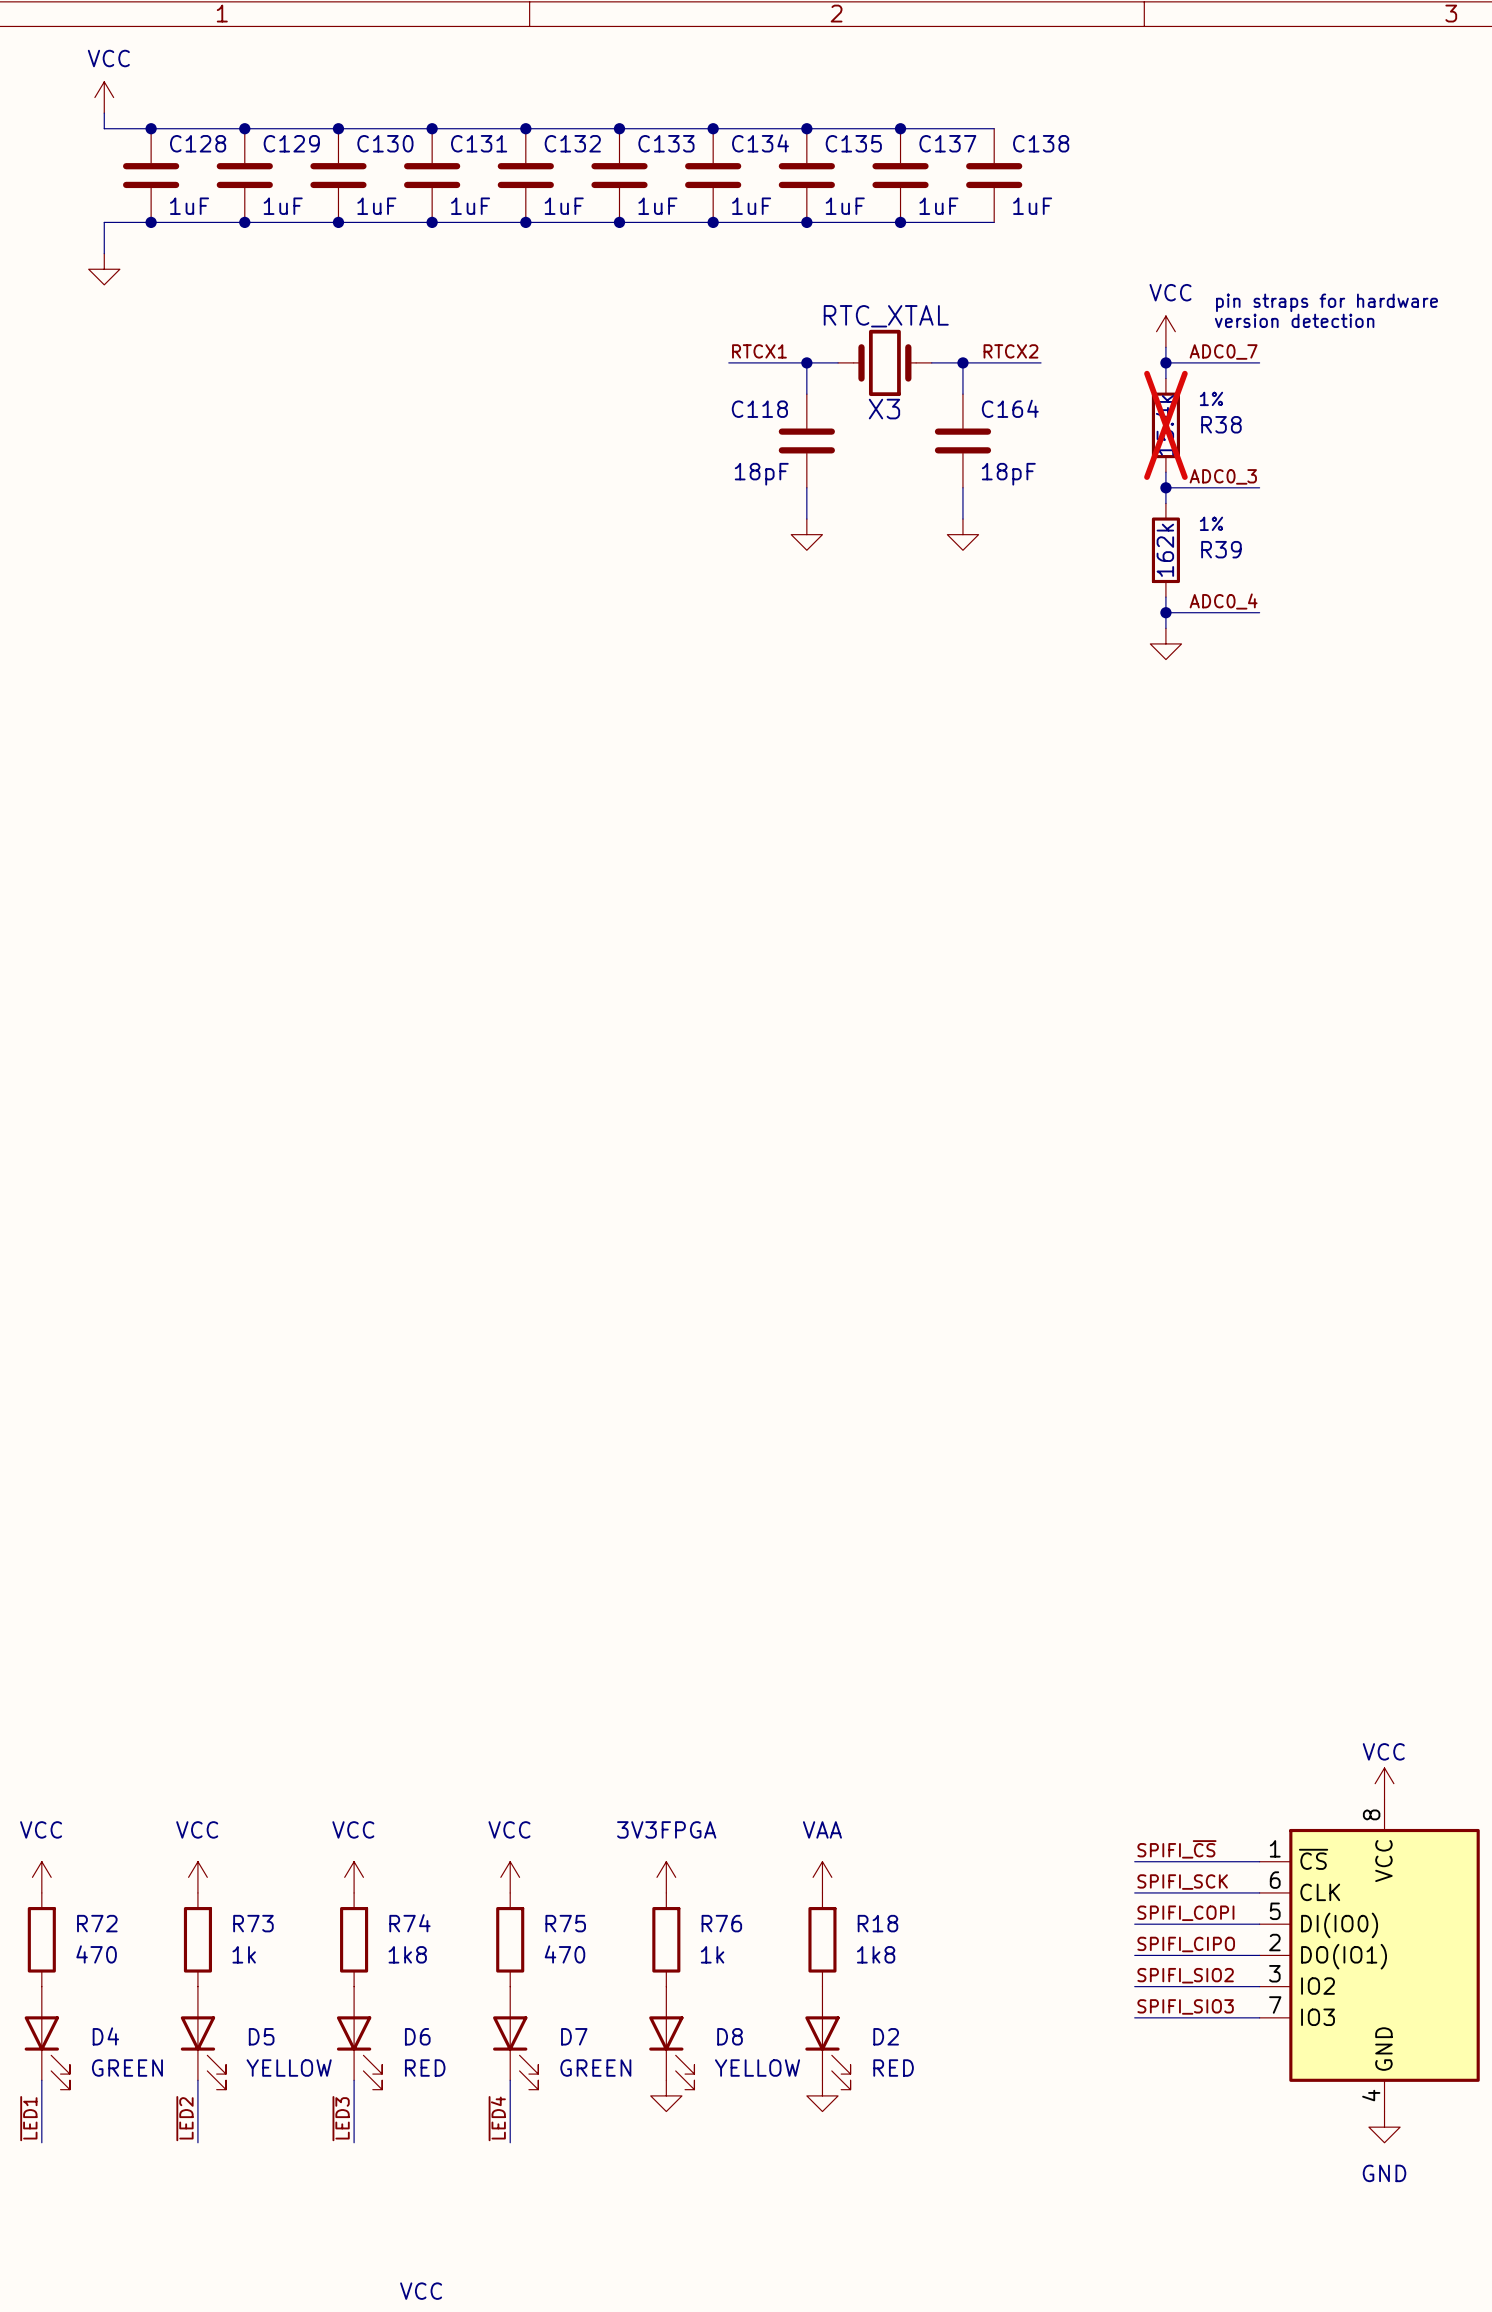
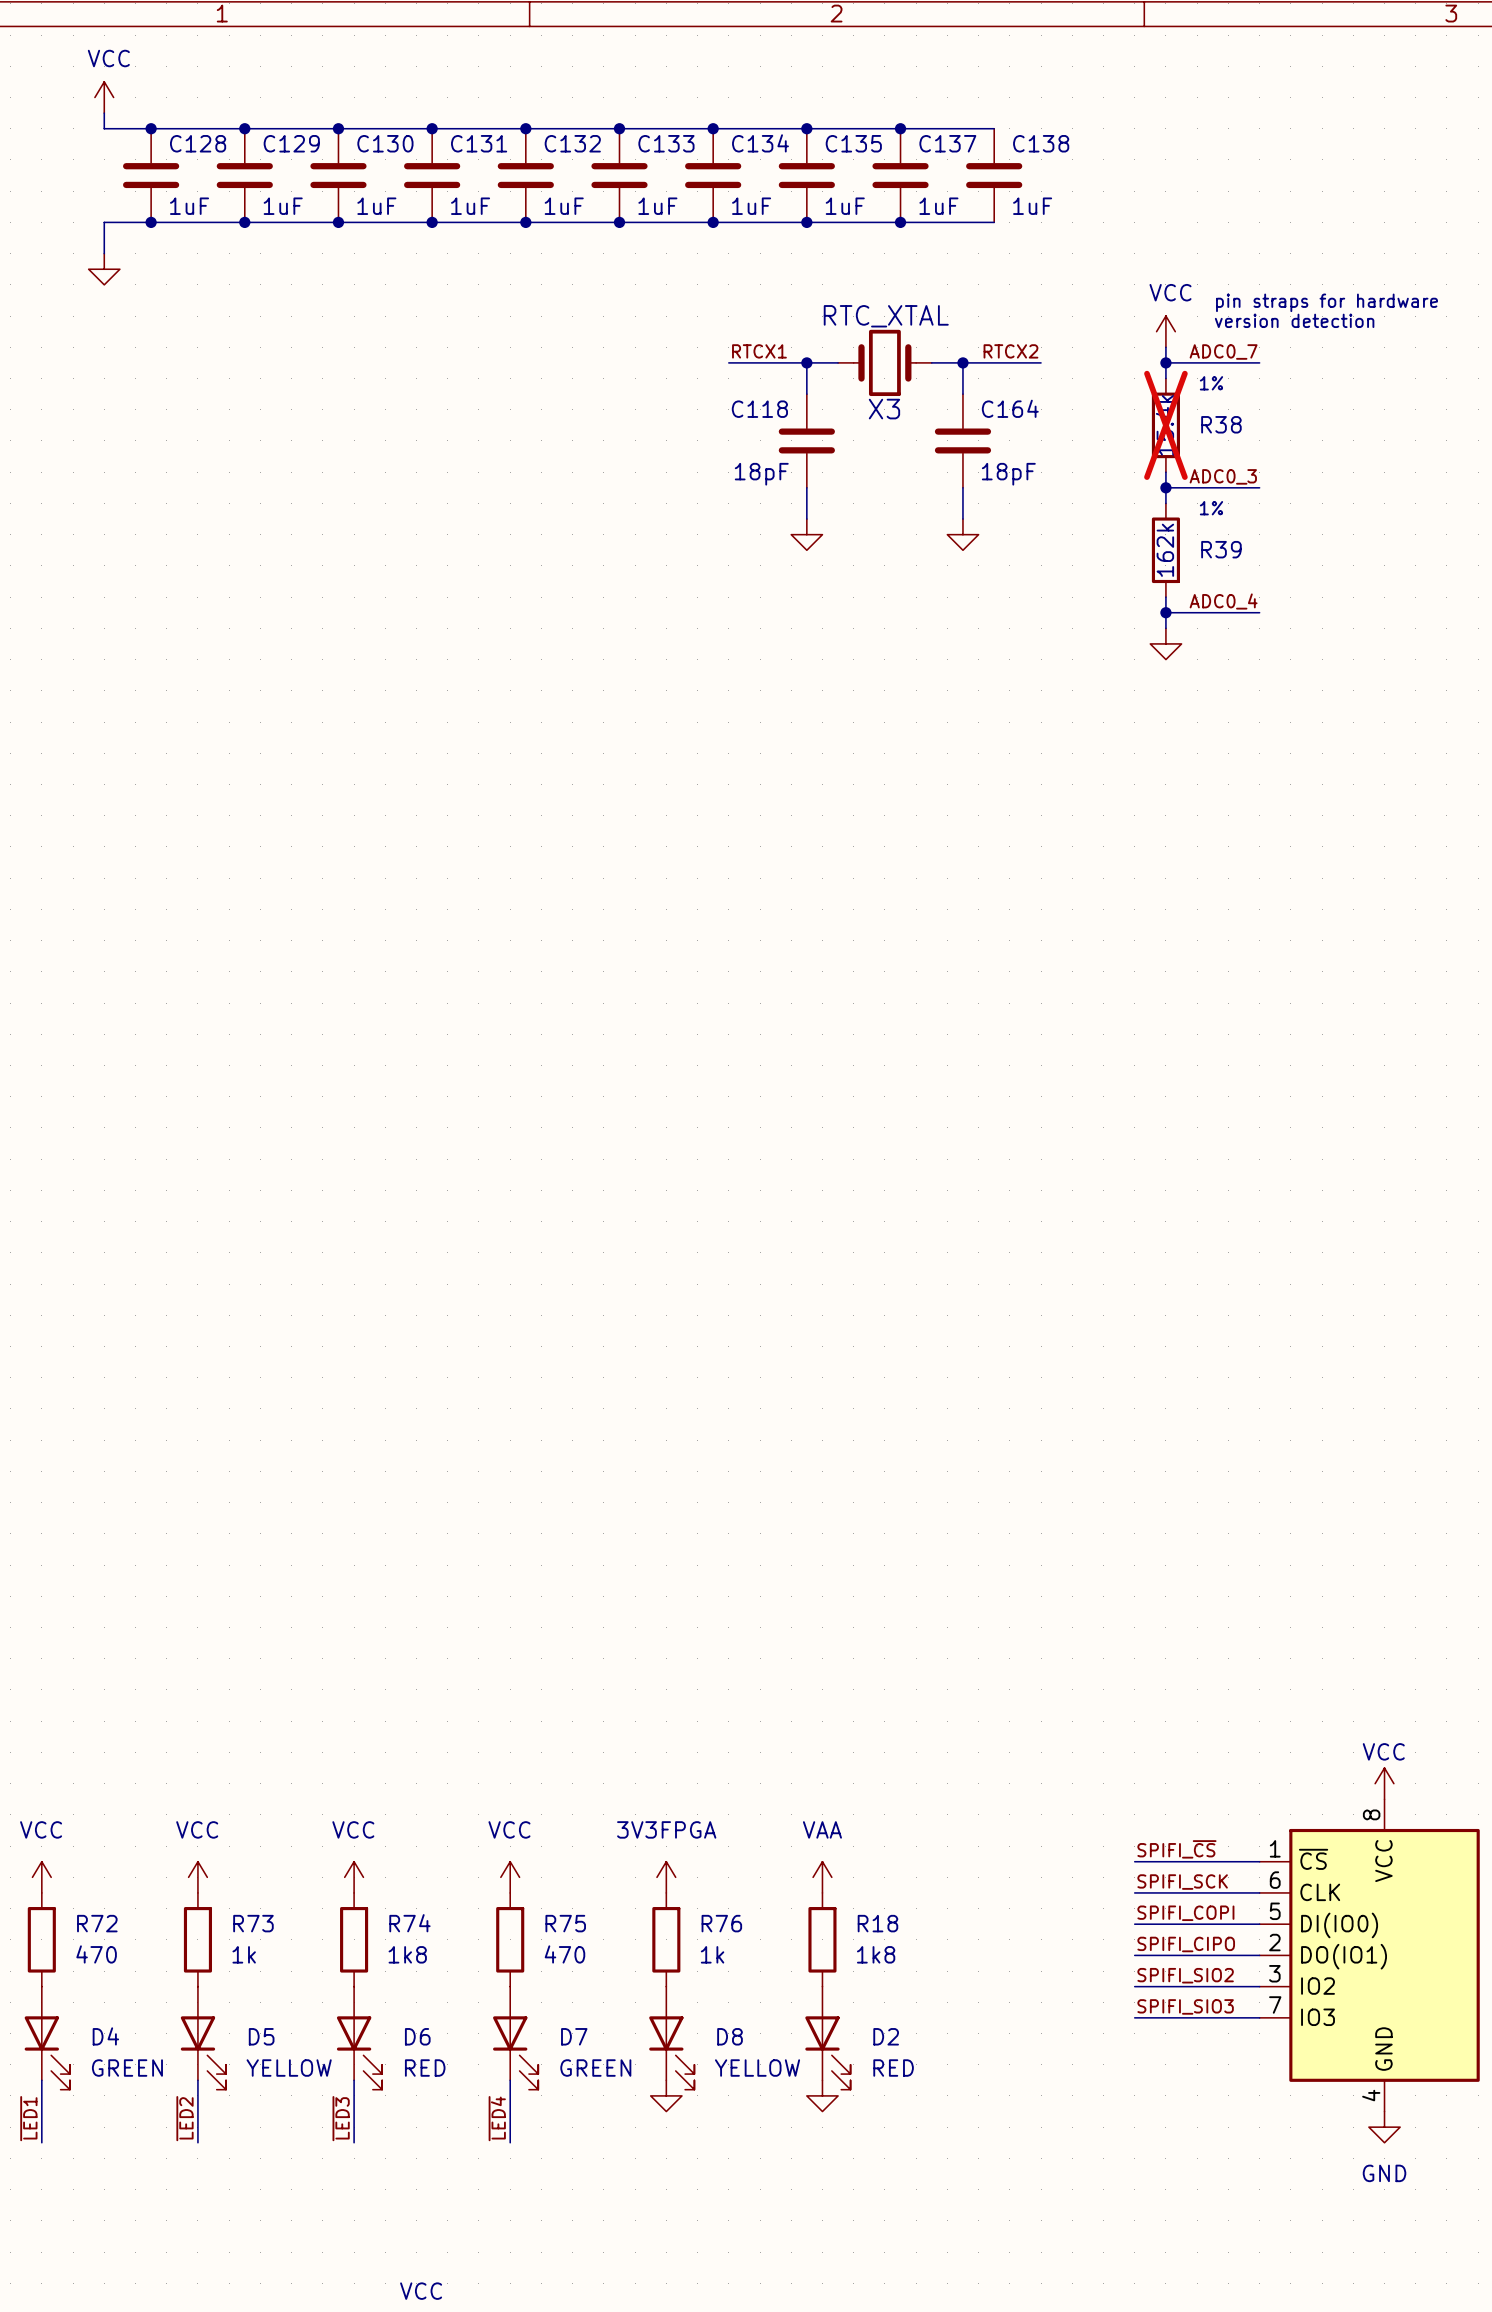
text position: 1% (1211, 398) -> 1% (1211, 383)
text position: 1% (1211, 523) -> 1% (1211, 508)

